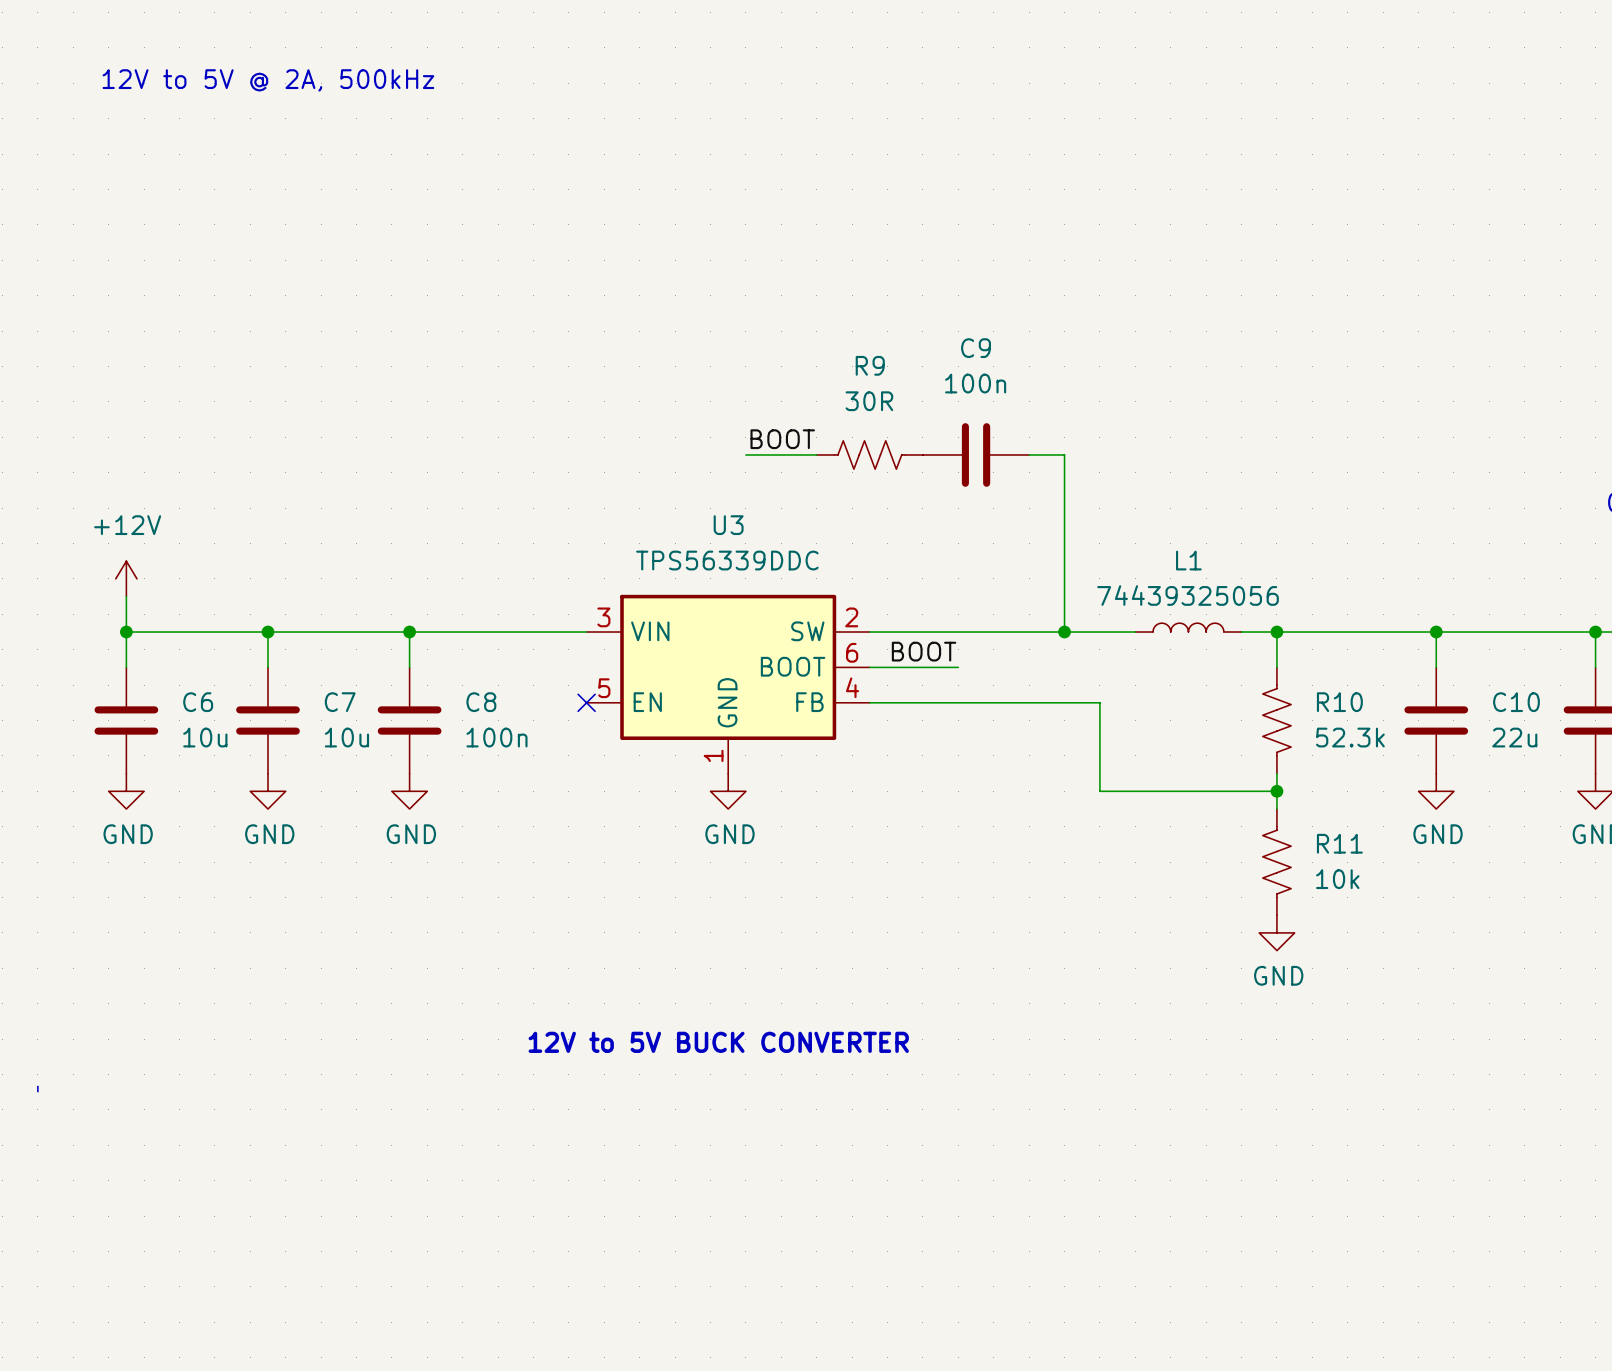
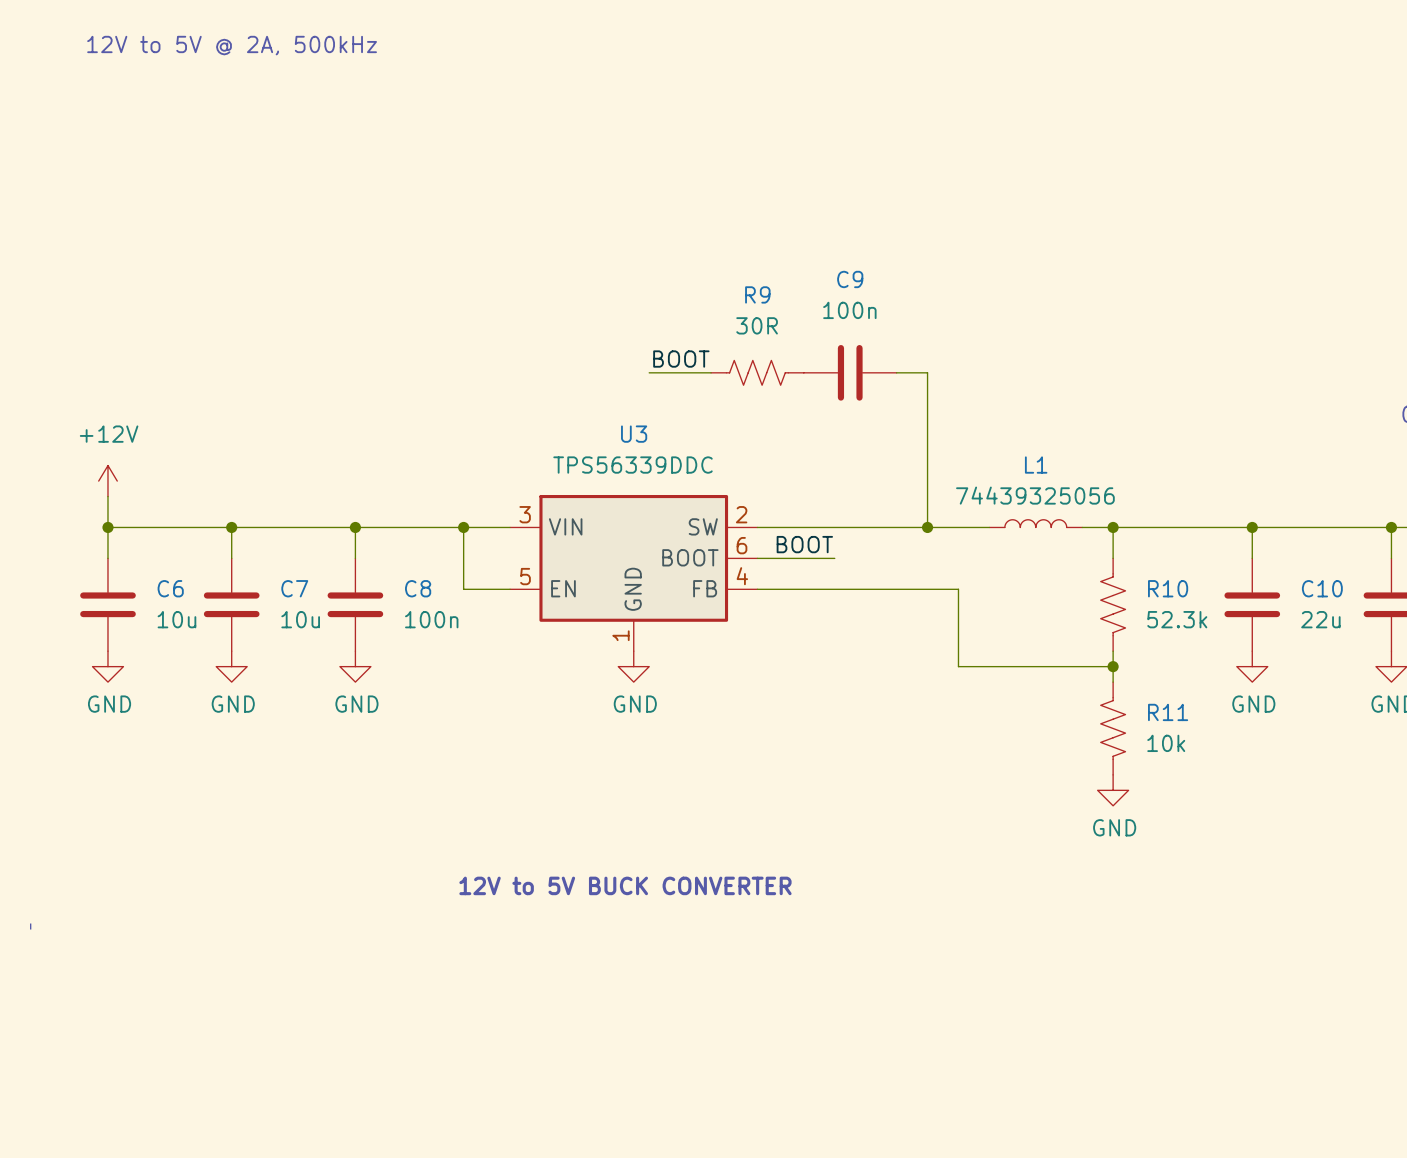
wire: none -> (463, 527) (463, 589) (510, 589)
junction: none -> (463, 527)
no-connect mark: (586, 702) -> none

